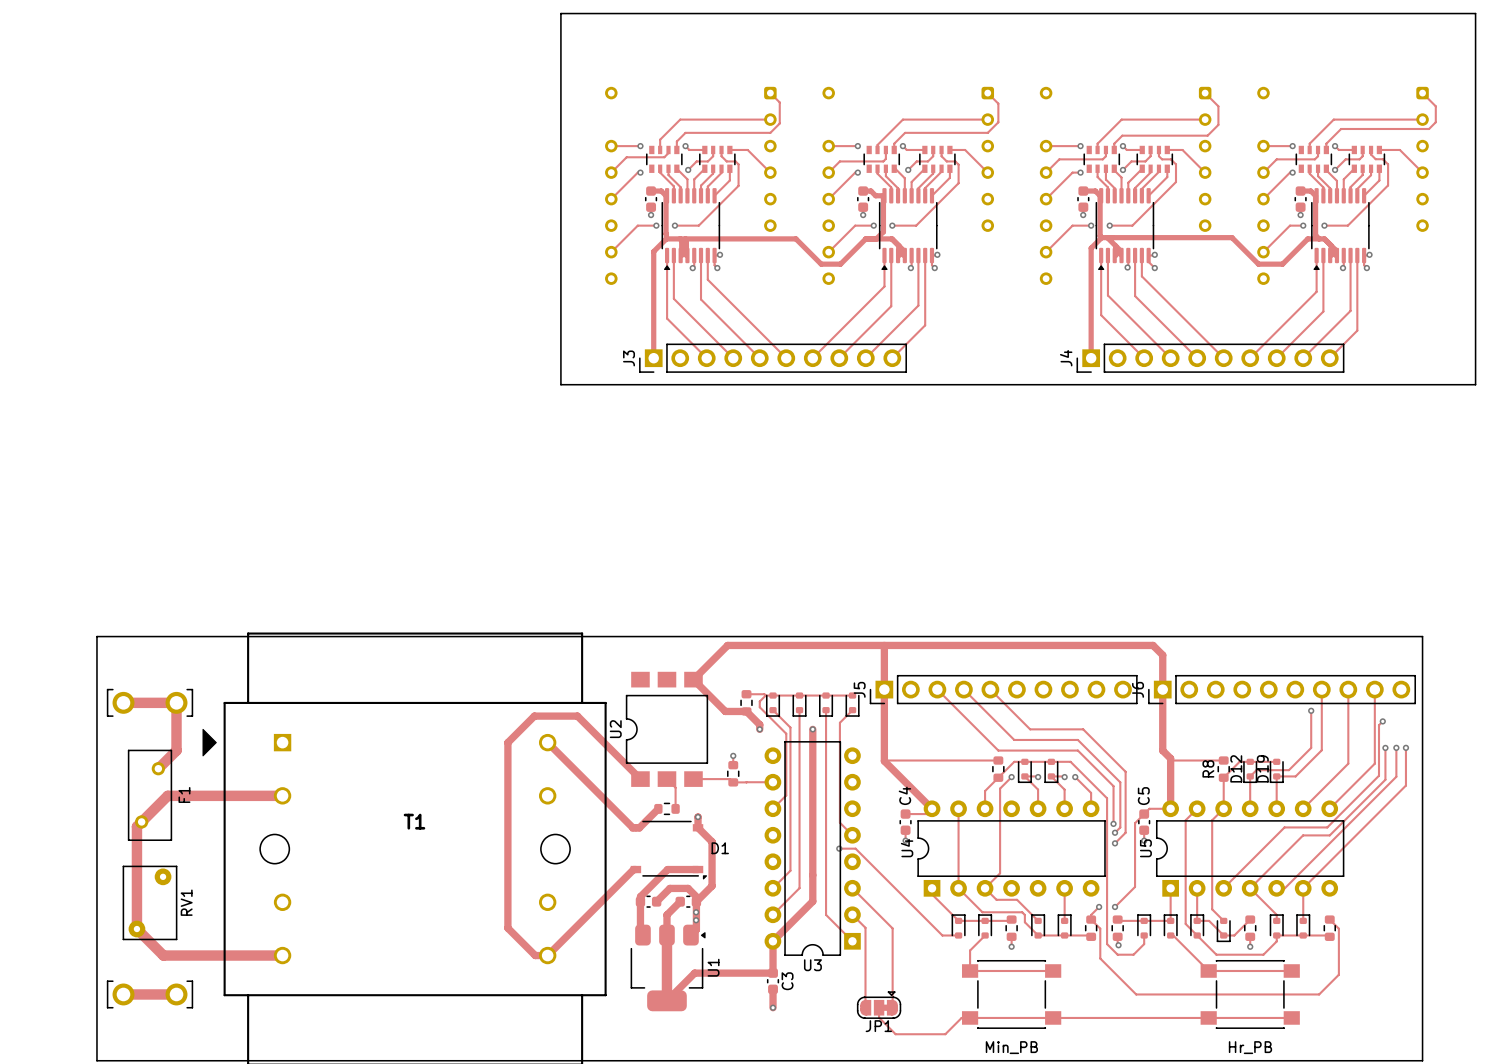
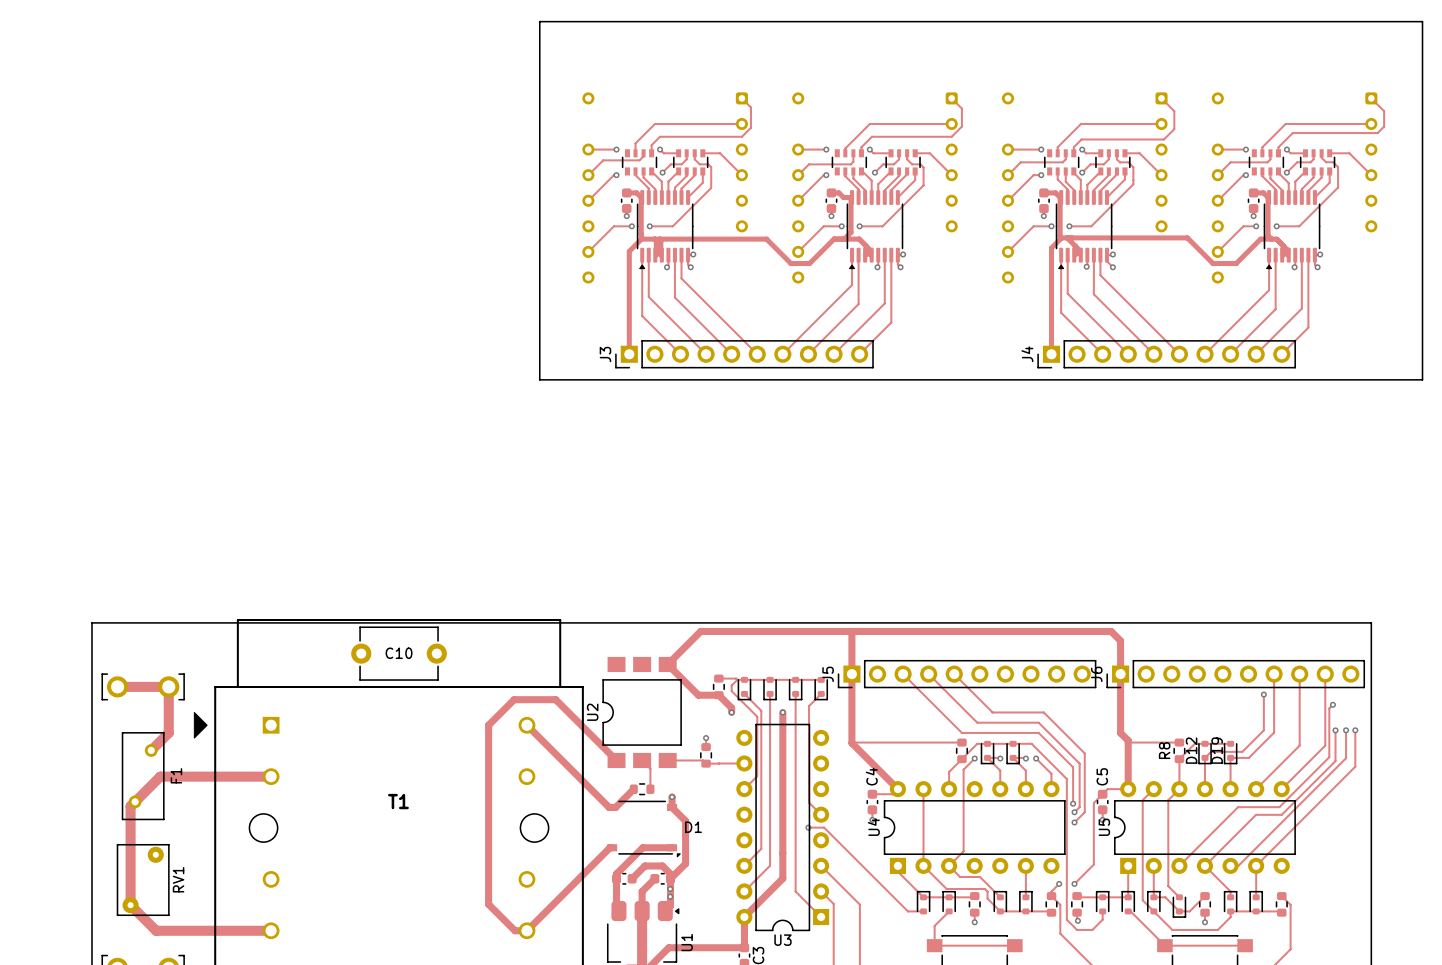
C10: none -> (399, 653)

